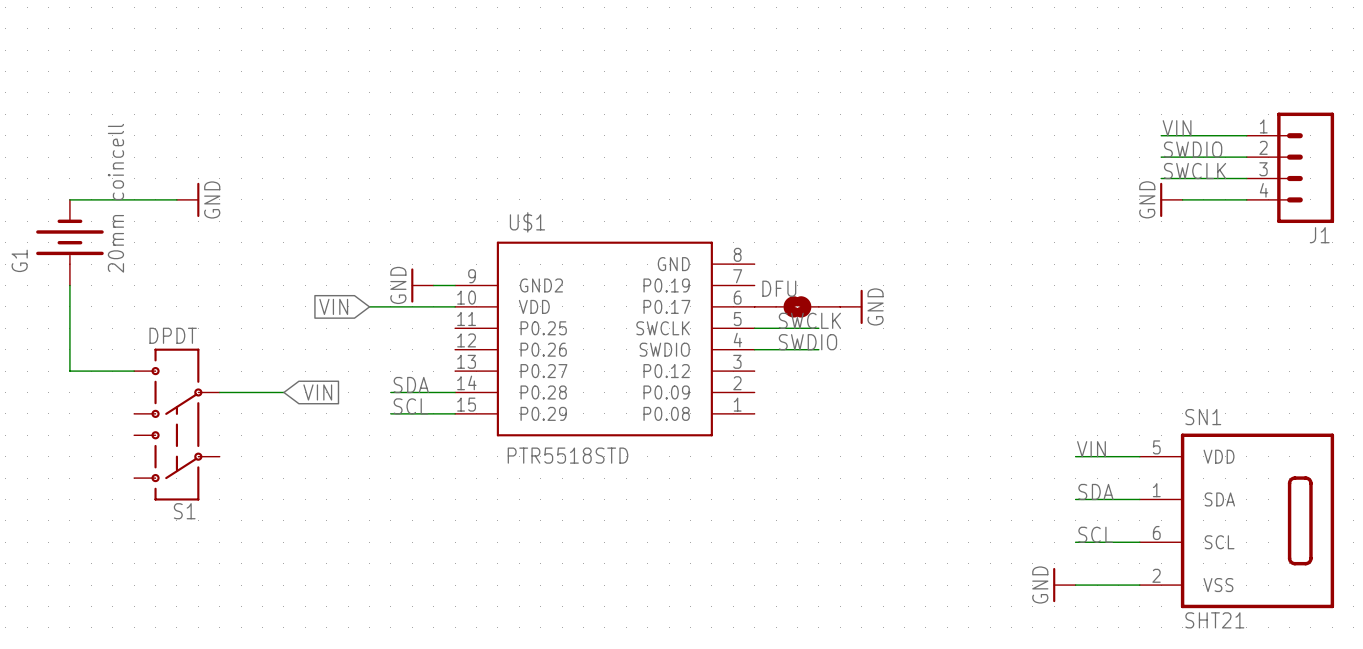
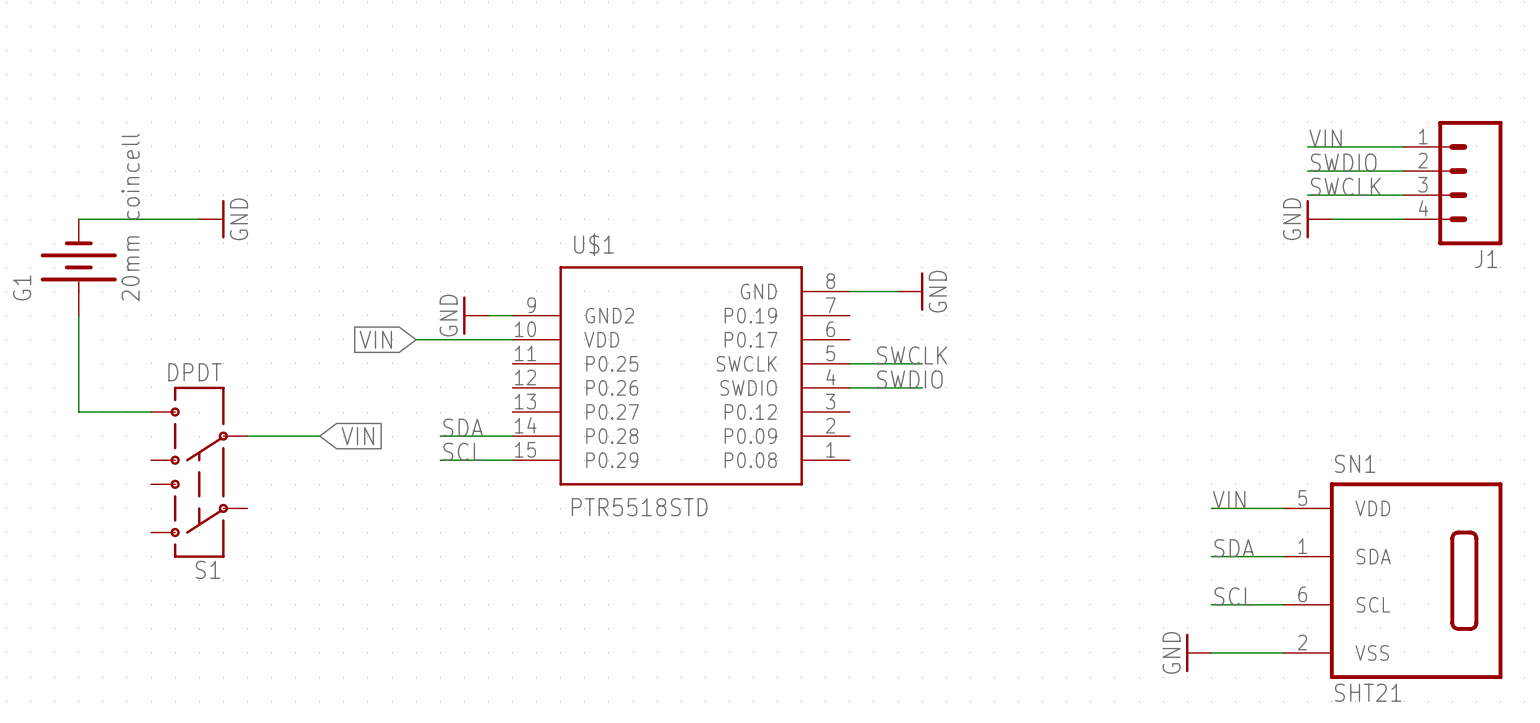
wire: none -> (849, 291) (898, 291)
DFU: (797, 306) -> none
power symbol position: GND (851, 306) -> GND (910, 291)

